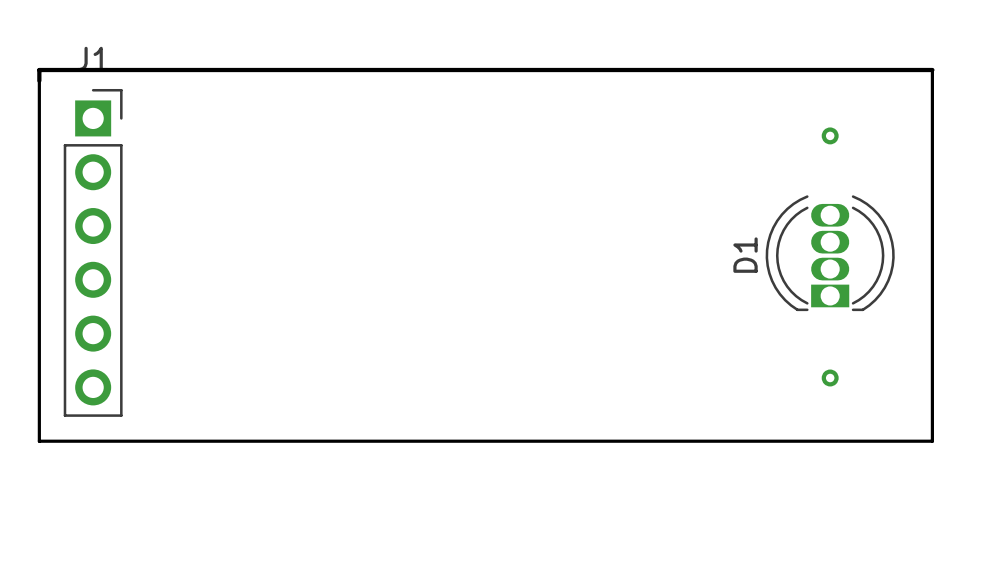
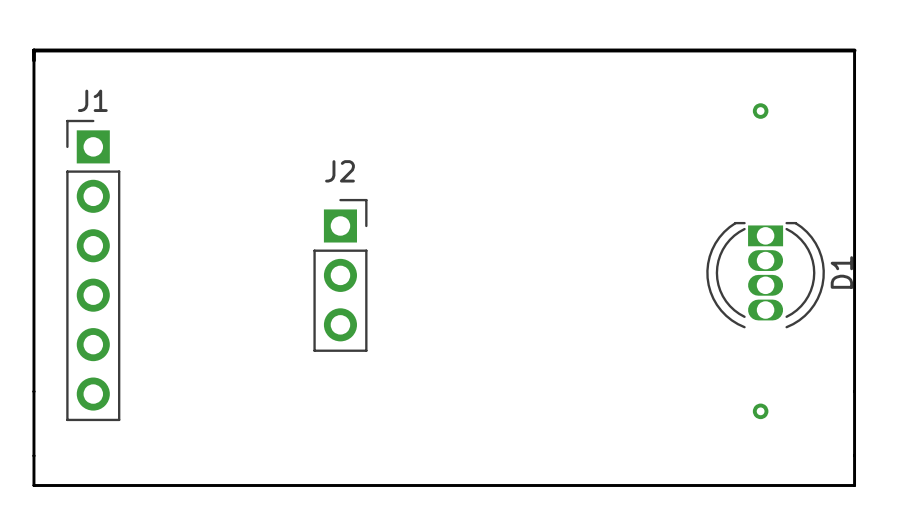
J1 footprint: [63, 88, 123, 417] -> [66, 119, 121, 422]
D1 rotation: 0° (830, 253) -> 180° (765, 275)
J2: none -> (340, 275)
via position: (830, 378) -> (760, 411)
board edge: (39, 441) (932, 441) -> (33, 391) (33, 485) (854, 485) (854, 391)

